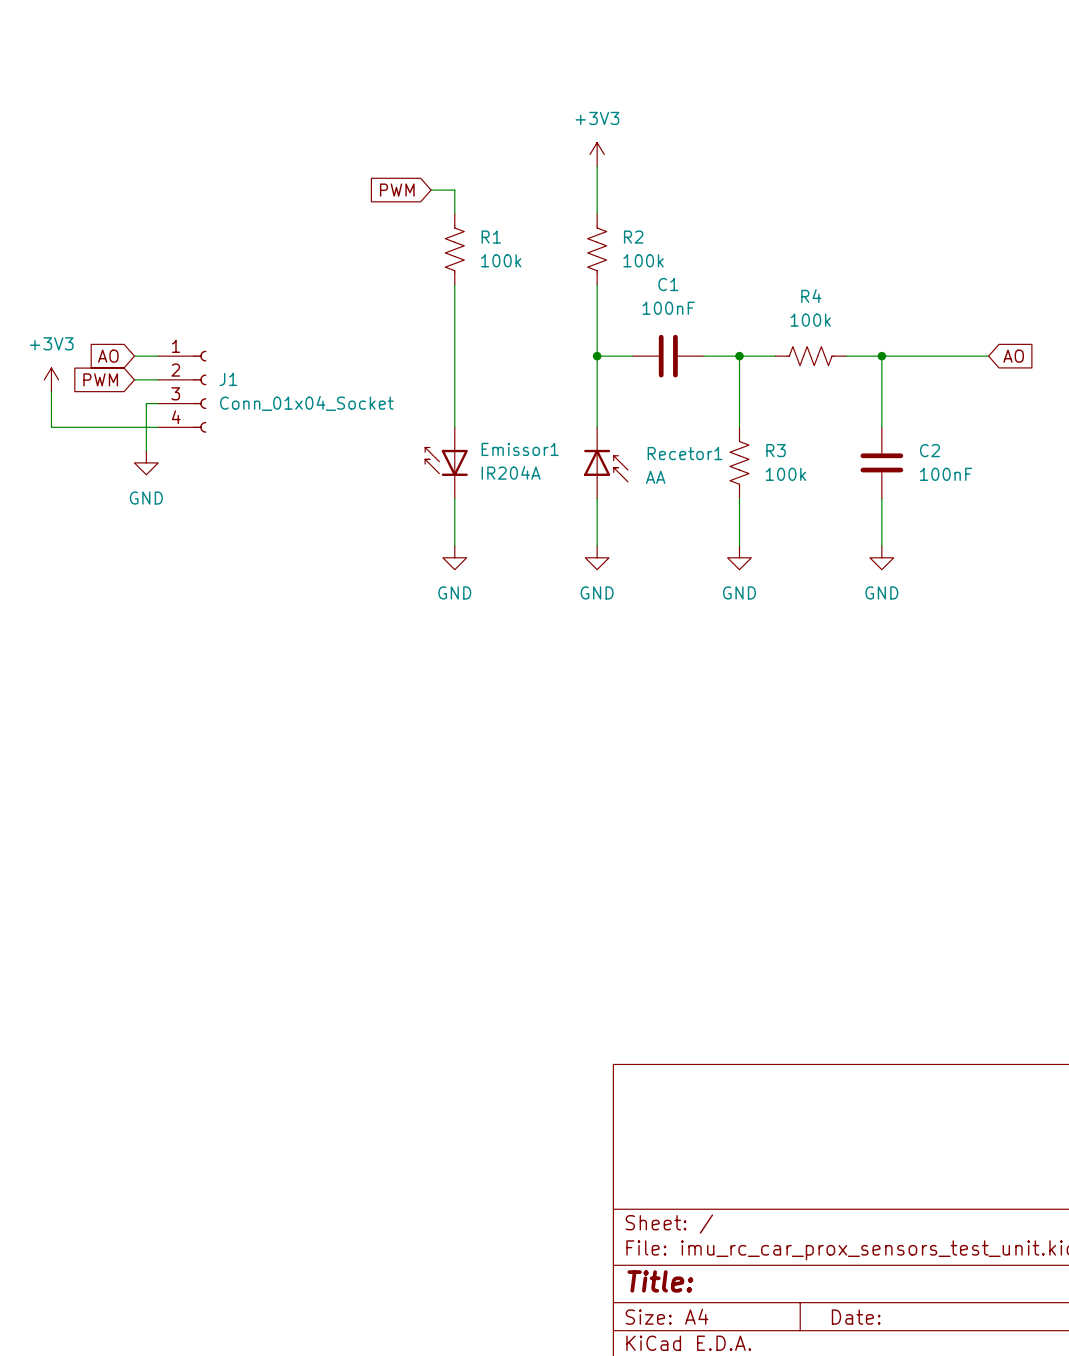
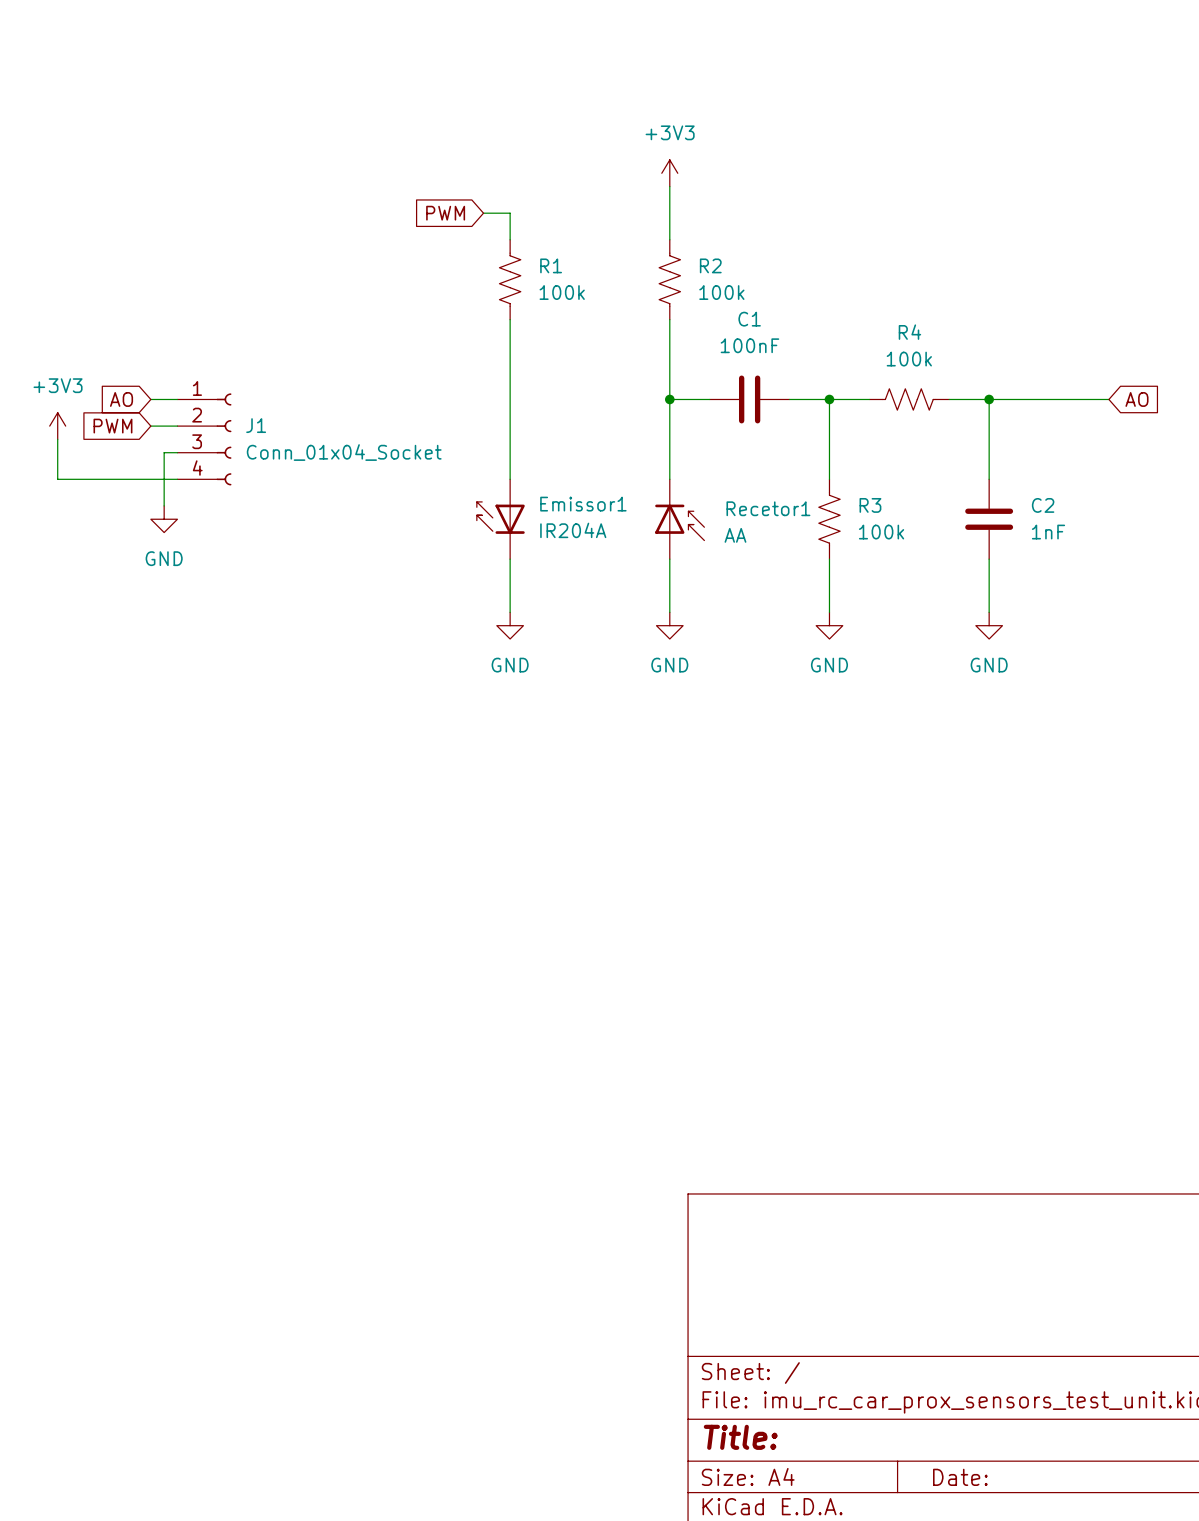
C2 value: 100nF (946, 474) -> 1nF (1048, 532)

